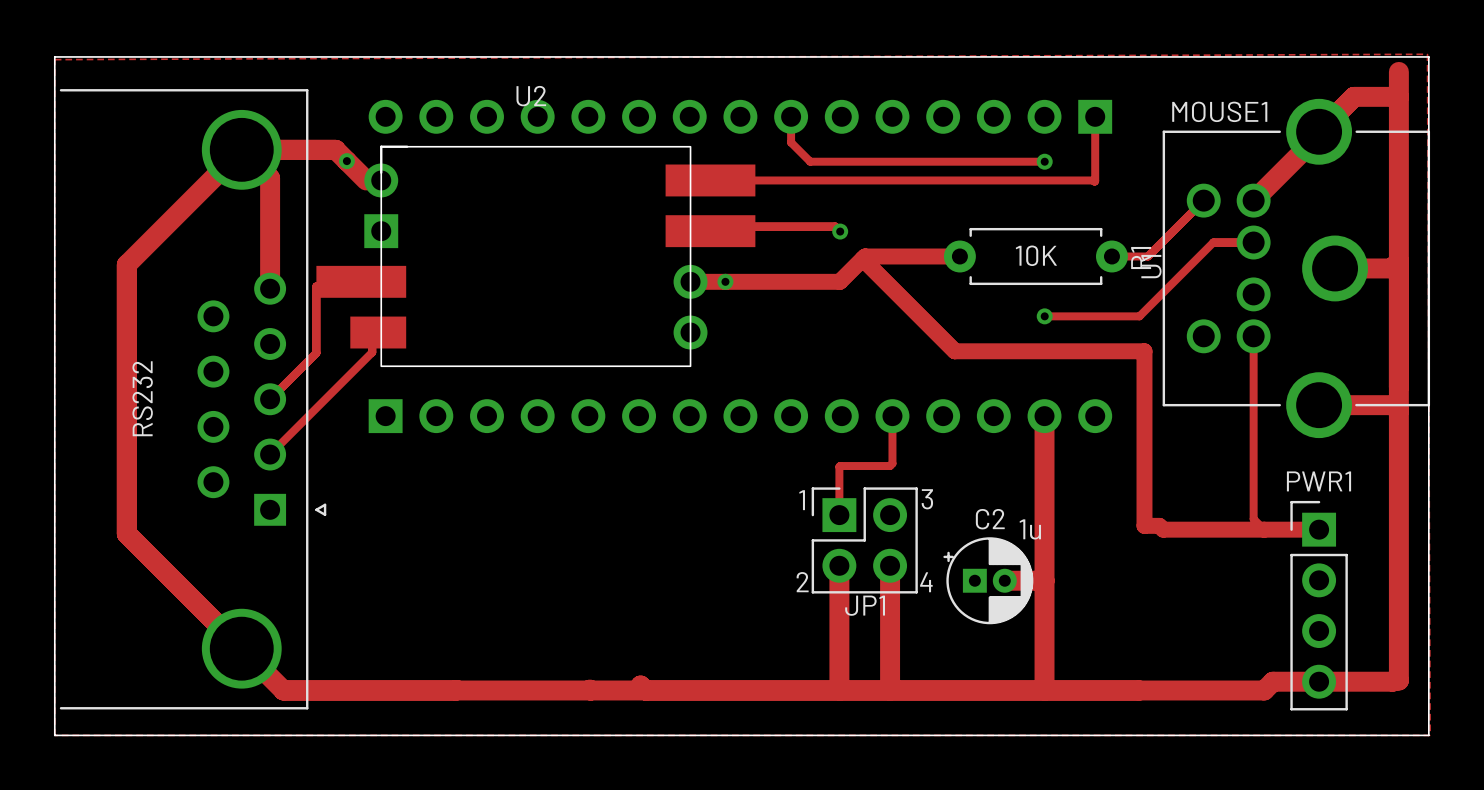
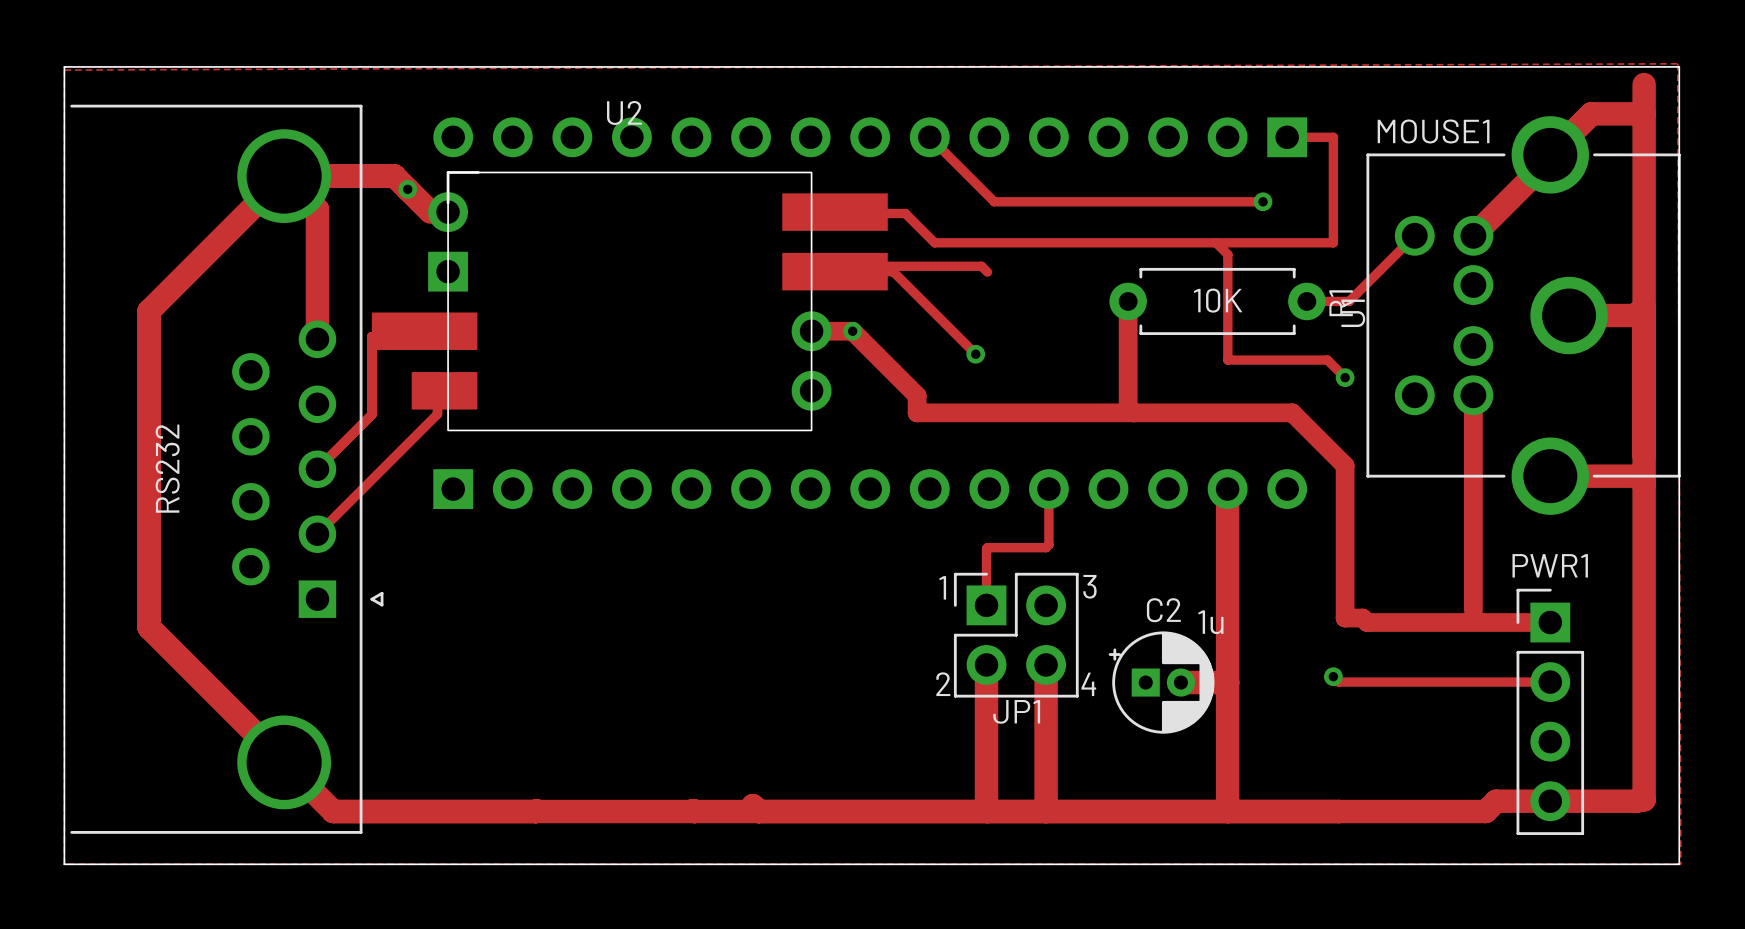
track: (791, 116) (791, 142) (810, 161) (1044, 161) -> (929, 137) (994, 201) (1263, 201)
track: (1095, 116) (1094, 181) (710, 180) -> (1287, 137) (1333, 137) (1333, 242) (934, 242) (905, 213) (835, 212)
via position: (1044, 161) -> (1263, 201)
track: none -> (1216, 242) (1227, 254) (1227, 360) (1327, 360) (1345, 377)
track: none -> (835, 271) (893, 271) (975, 354)
via position: (840, 231) -> (975, 354)
track: (1253, 242) (1213, 242) (1139, 316) (1044, 316) -> none
track: (959, 256) (865, 256) (839, 281) -> (1128, 301) (1128, 406) (1134, 412)
track: (725, 281) (839, 281) -> none
track: (839, 281) (862, 258) (954, 351) -> (852, 331) (917, 395) (917, 412) (1122, 412)
via: (1044, 316) -> none
via: none -> (1345, 377)
track width: thin (1253, 336) (1253, 519) -> thick (1473, 395) (1473, 610)
track: (1099, 351) (1144, 351) (1144, 396) -> (1292, 412) (1345, 465)
track: none -> (1333, 676) (1338, 682) (1550, 682)
via: none -> (1333, 676)

